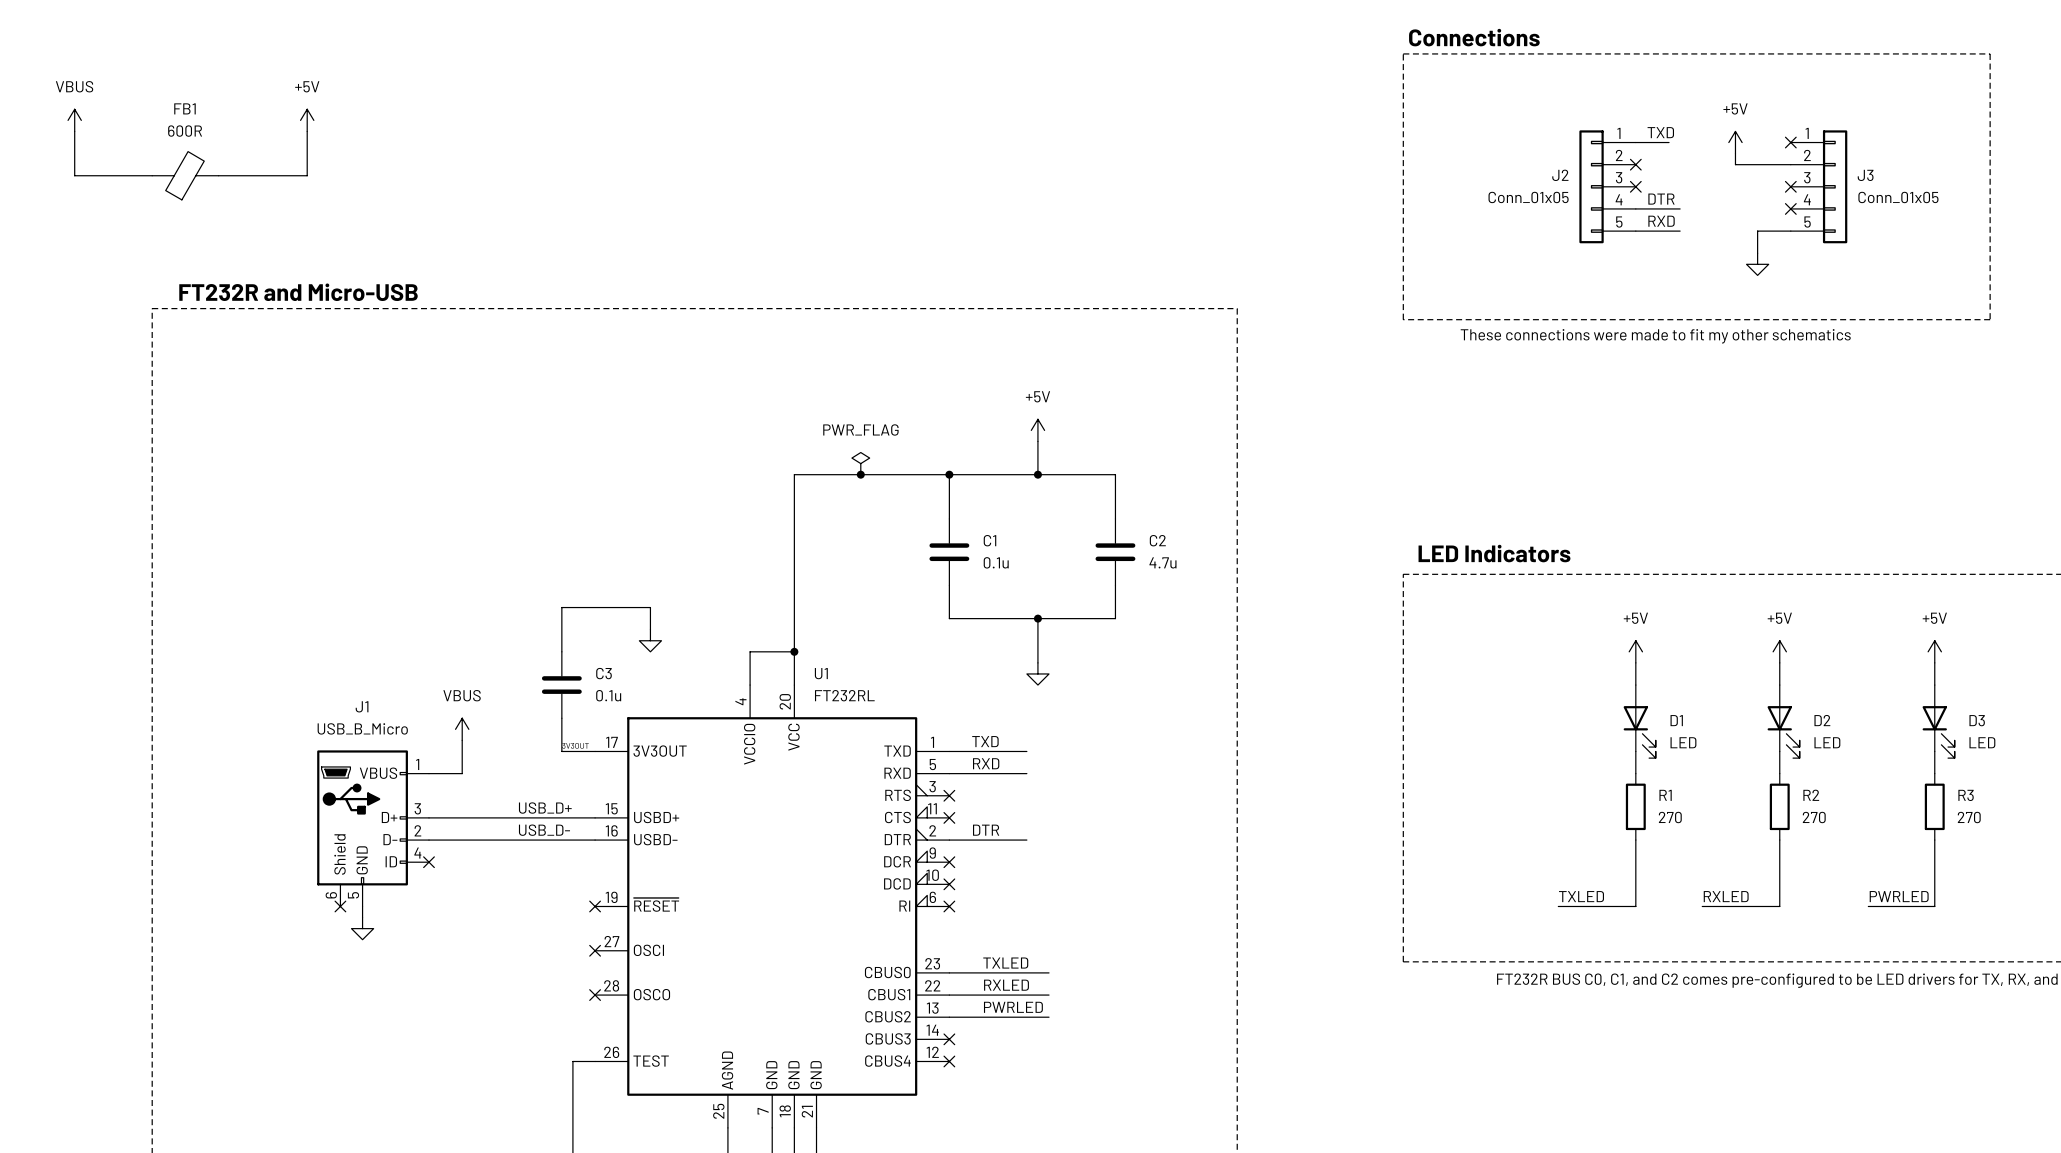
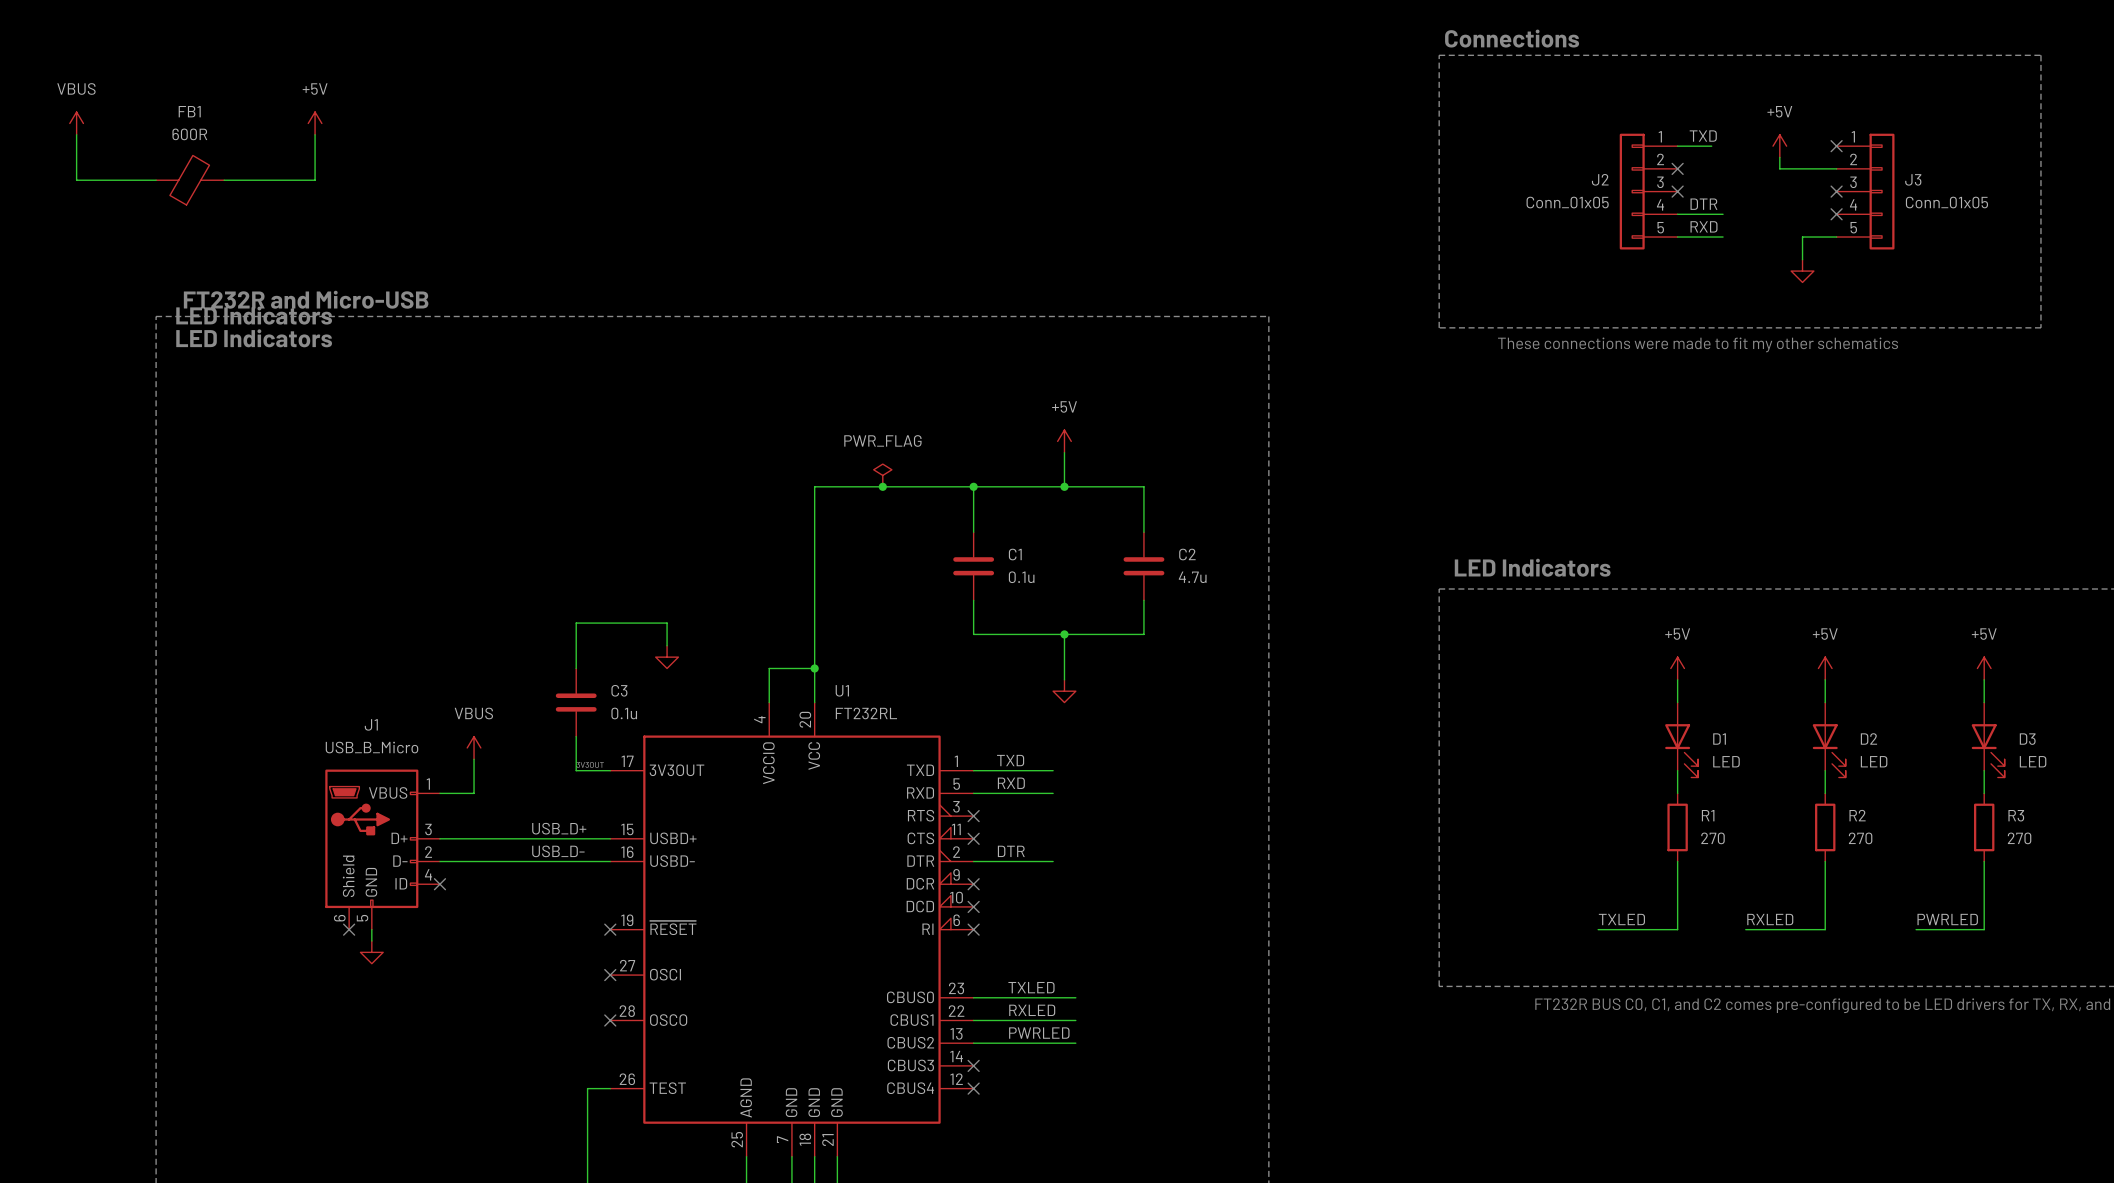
text: none -> LED Indicators (254, 315)
text: none -> LED Indicators (254, 338)

